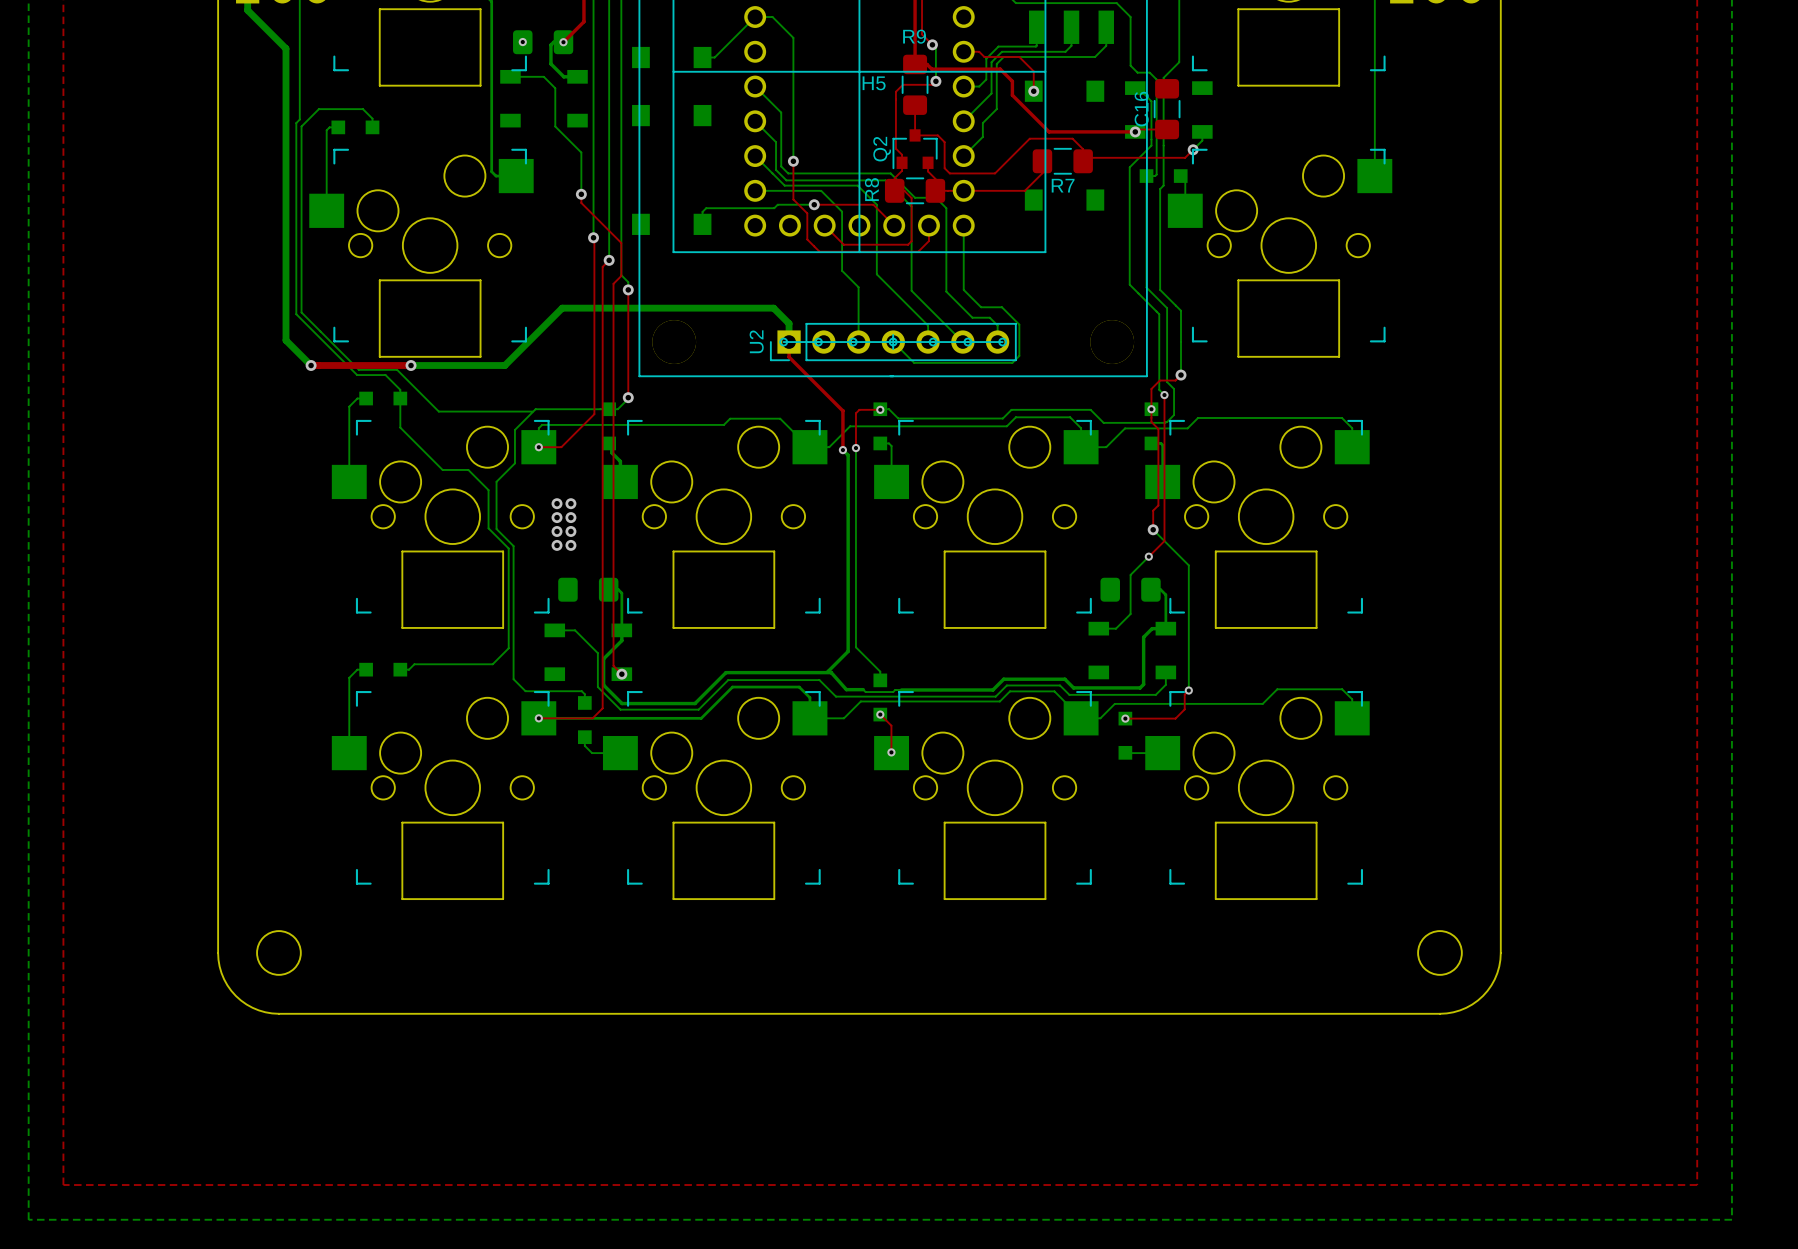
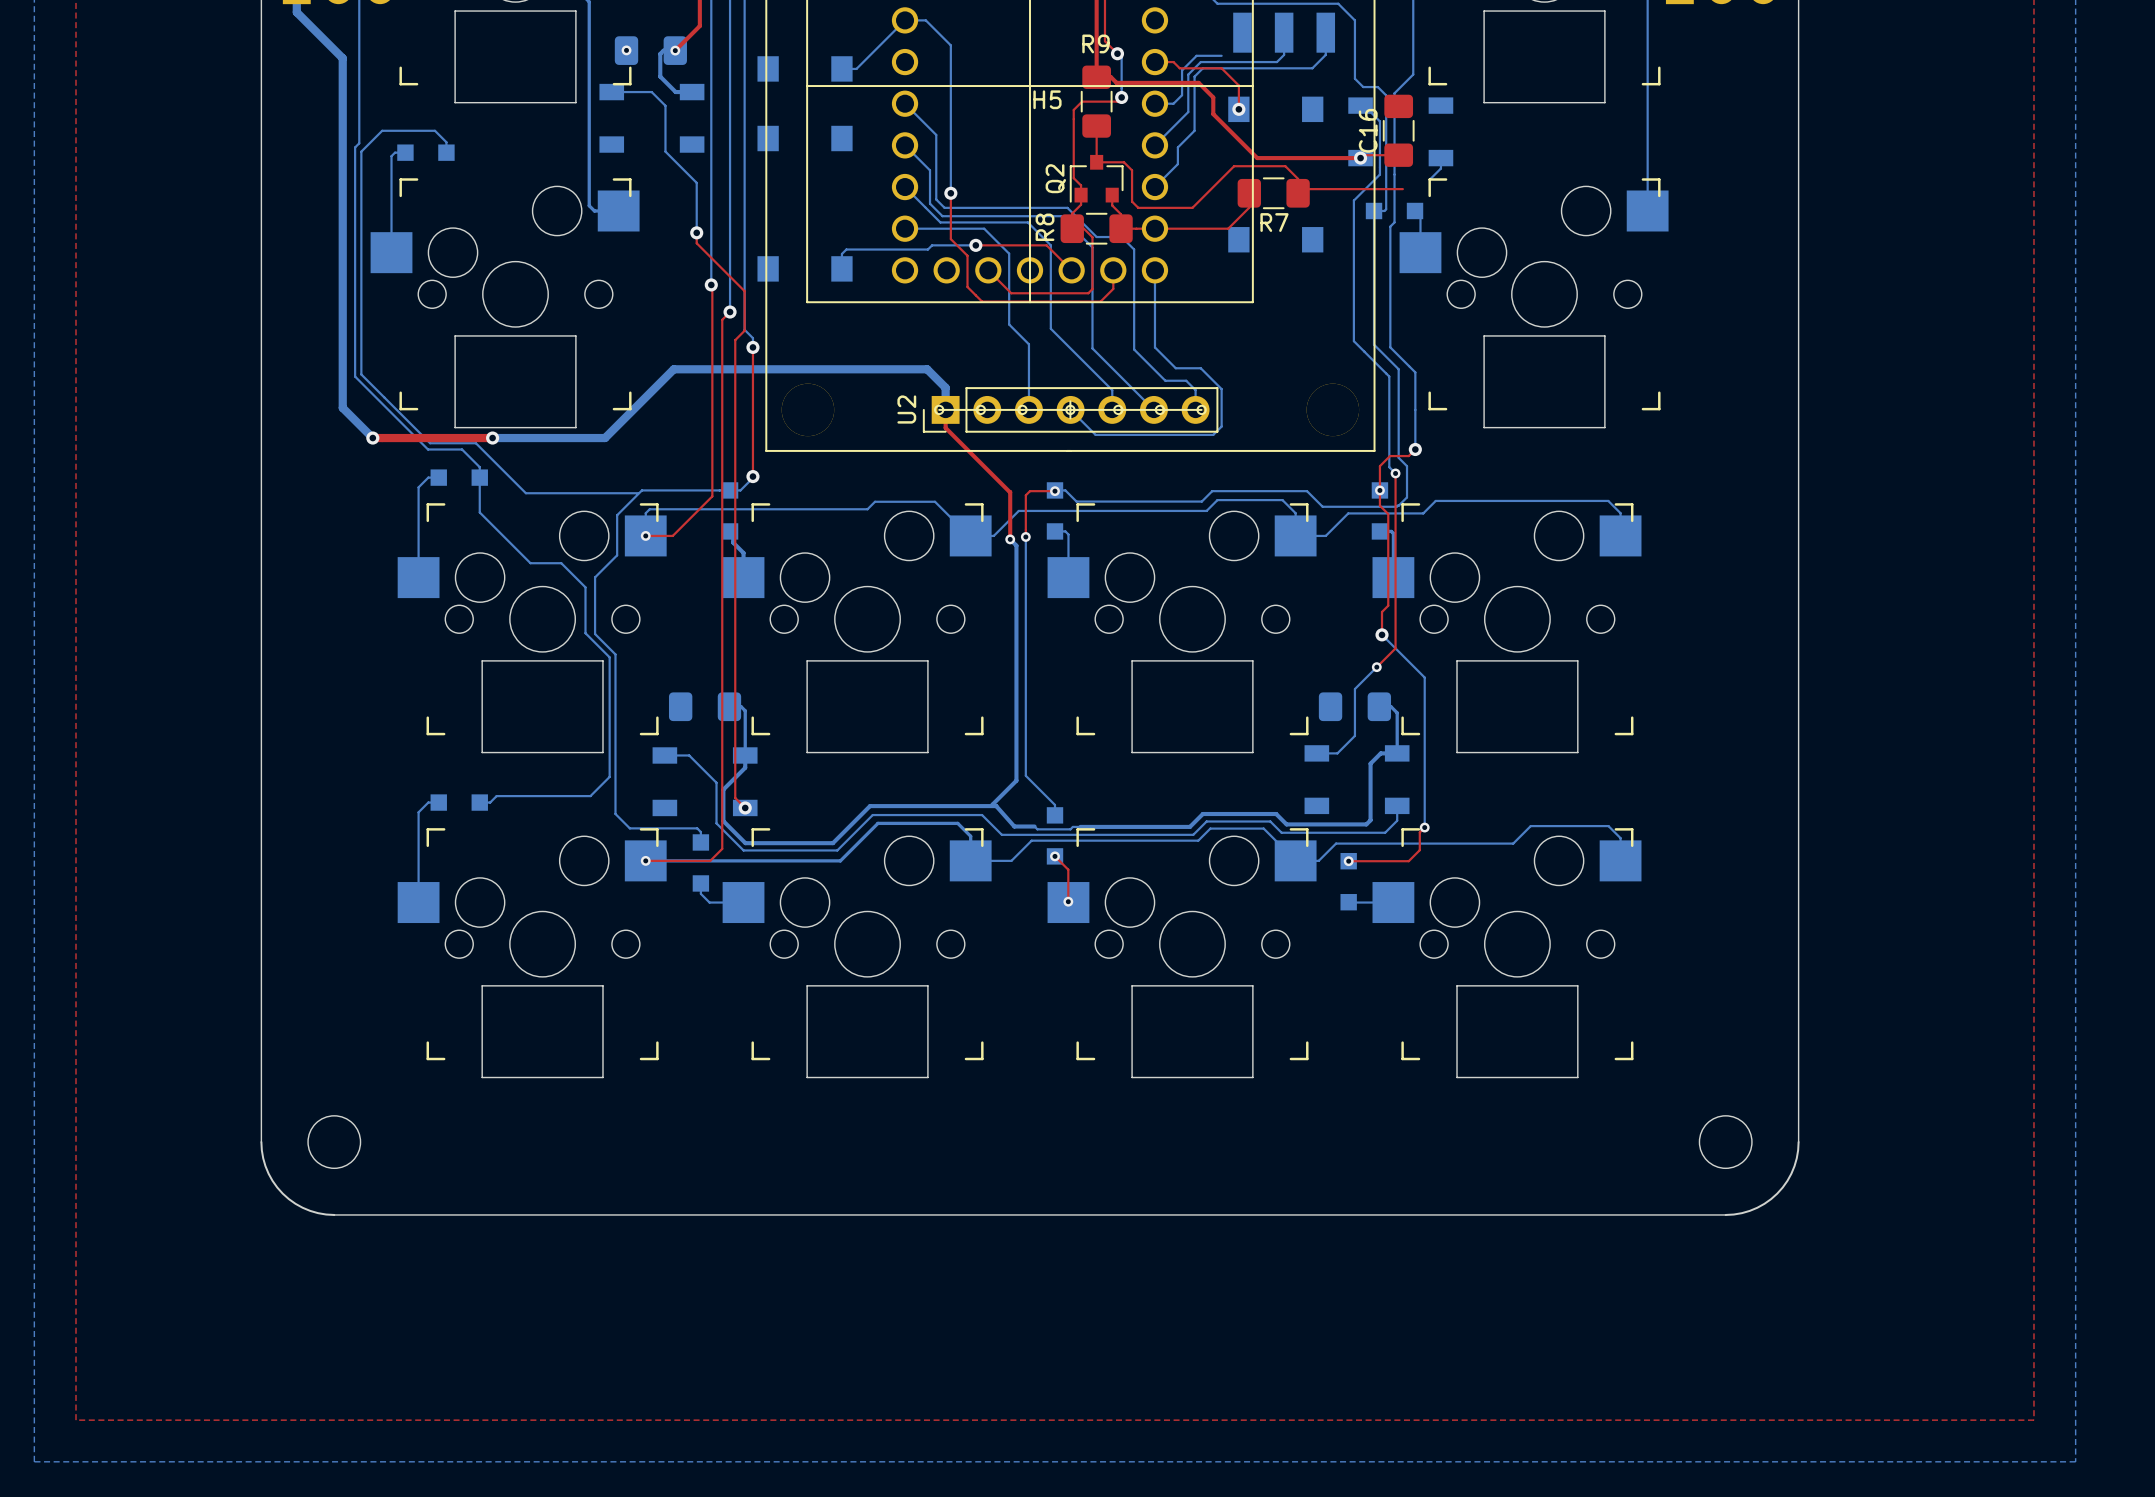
bottom track: (1036, 27) (1036, 45) (1019, 46) -> none
top track: (1193, 149) (1185, 157) (1170, 157) -> none
via: (1193, 149) -> none
via: (557, 503) -> none
via: (570, 503) -> none
via: (557, 517) -> none
via: (570, 517) -> none
via: (557, 531) -> none
via: (570, 531) -> none
via: (557, 545) -> none
via: (570, 545) -> none

